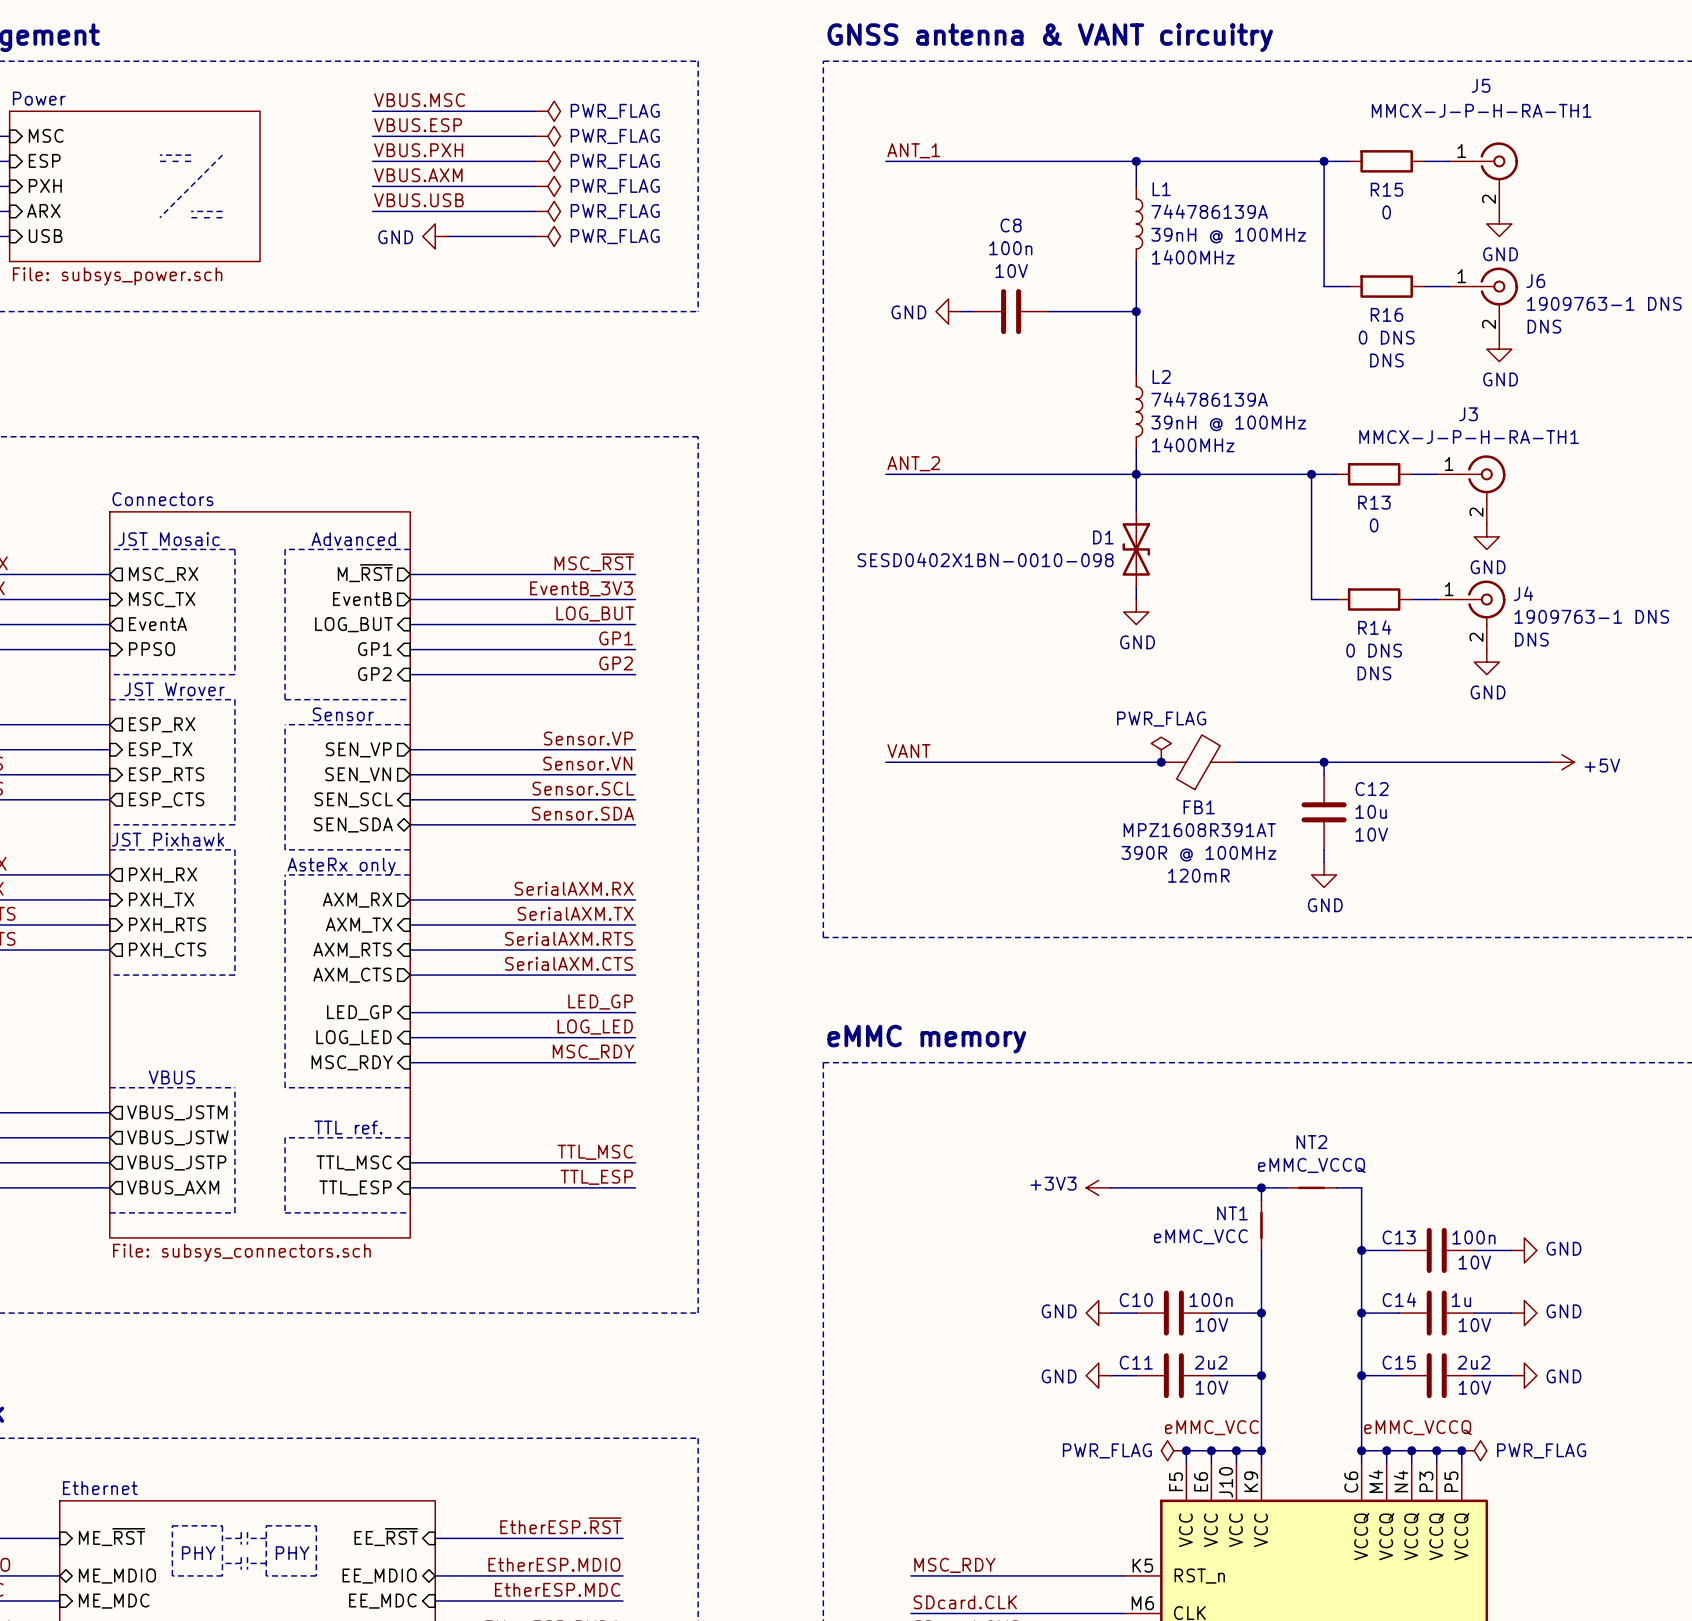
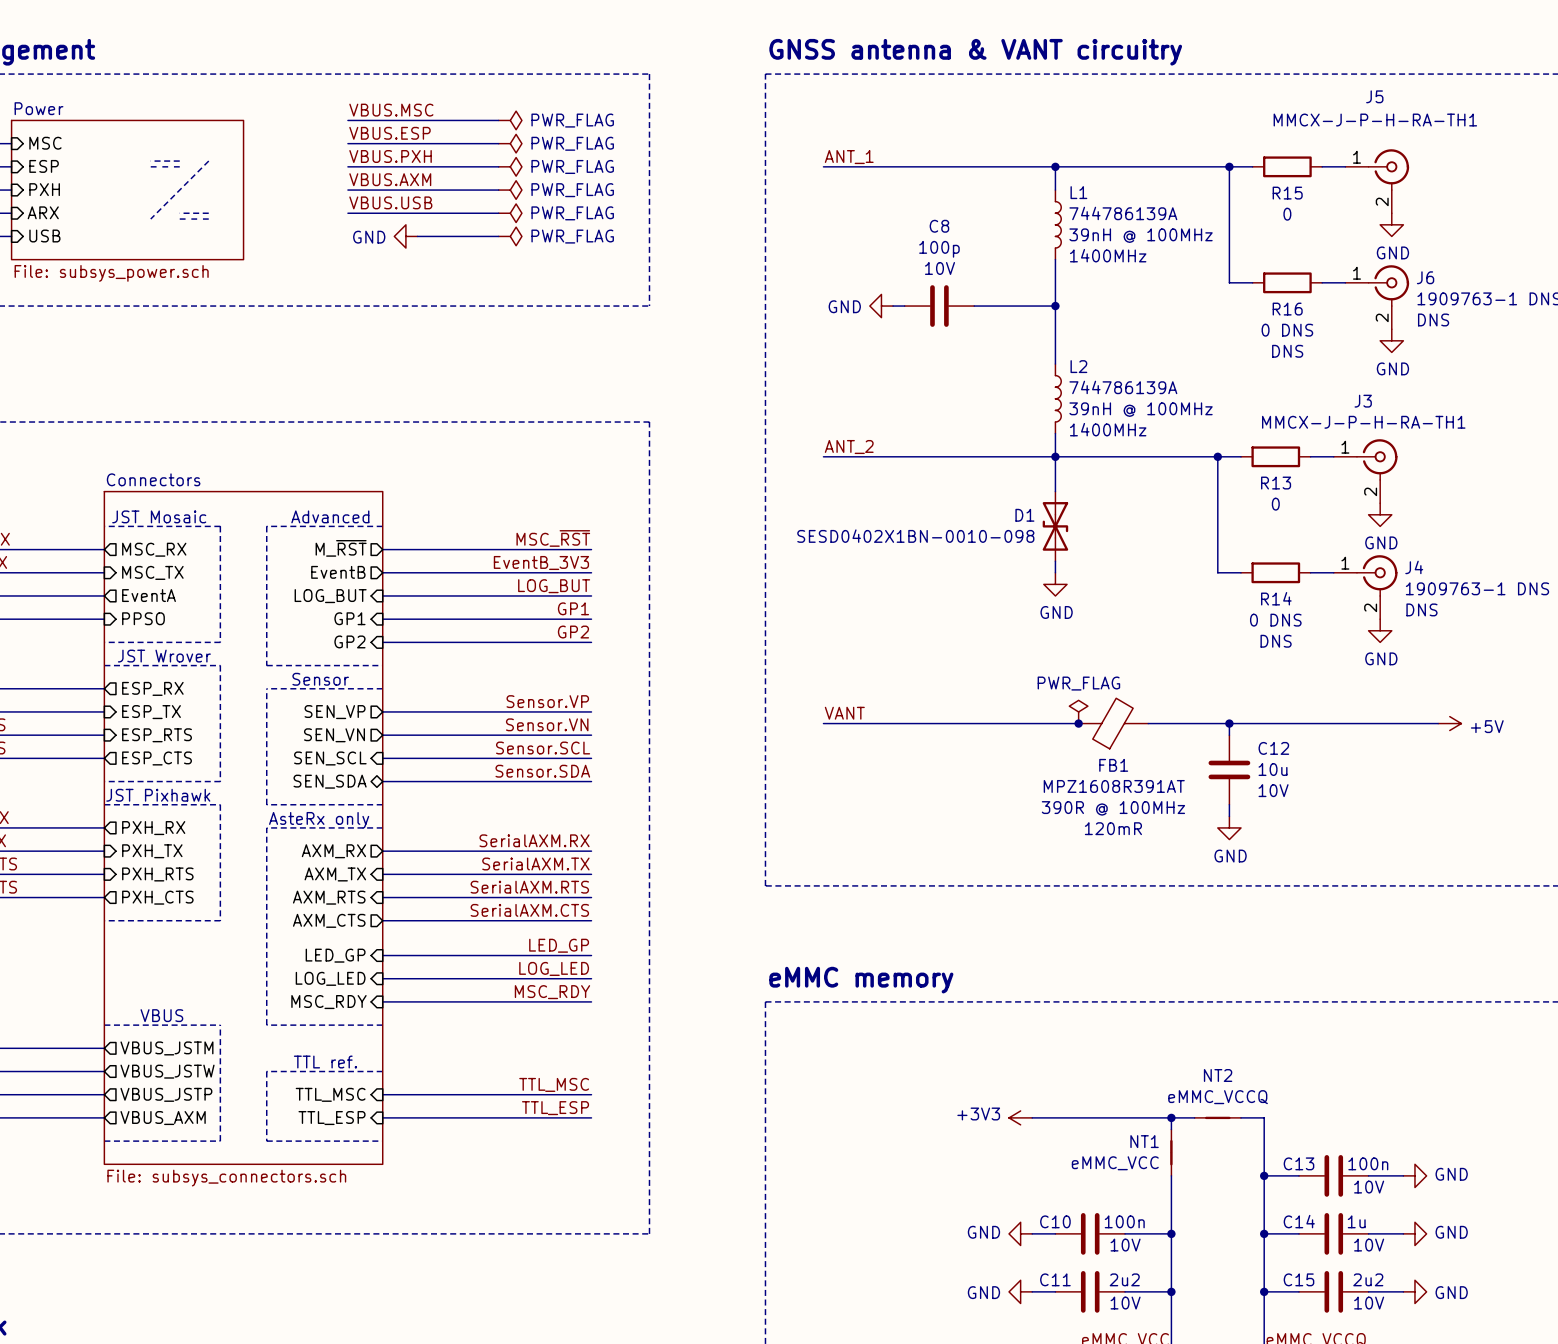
C8 value: 100n (1010, 248) -> 100p (939, 249)

